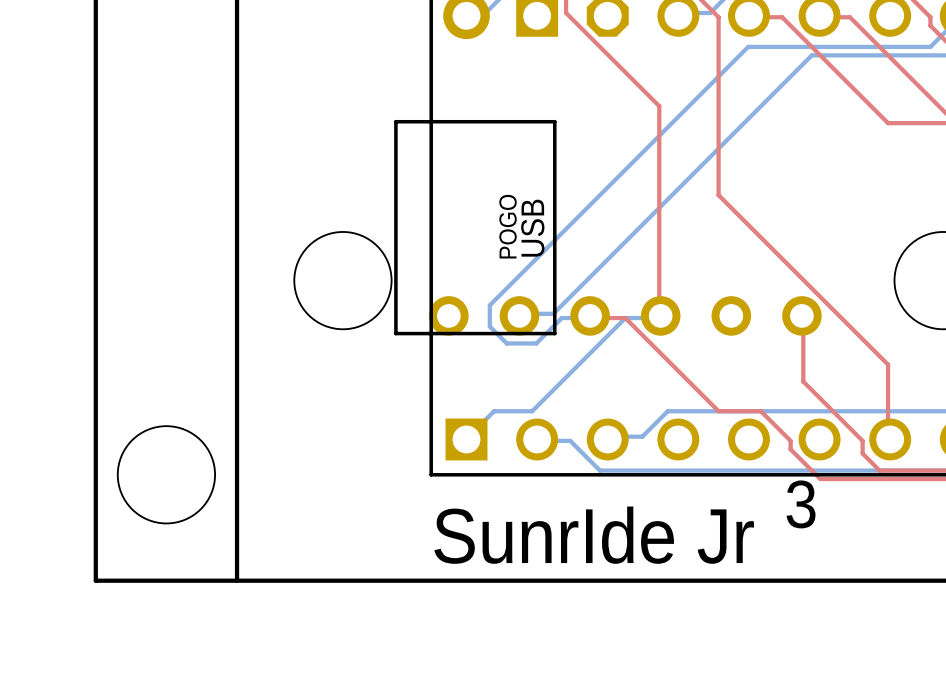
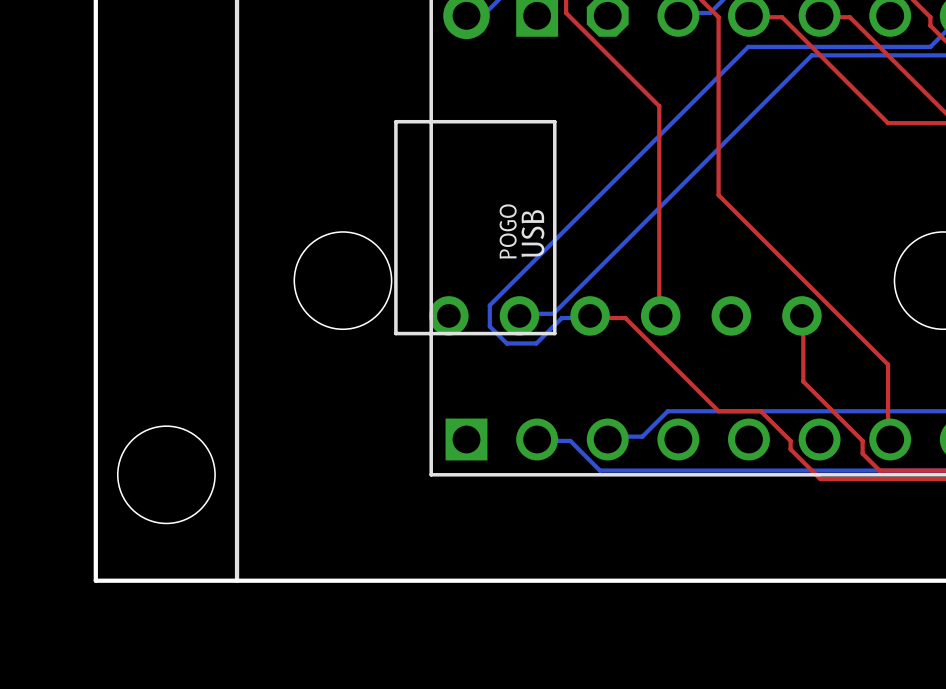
bottom track: (660, 315) (659, 318) (625, 318) (532, 411) (494, 411) (466, 439) -> none
text: 3 (801, 504) -> none
text: SunrIde Jr (594, 535) -> none

